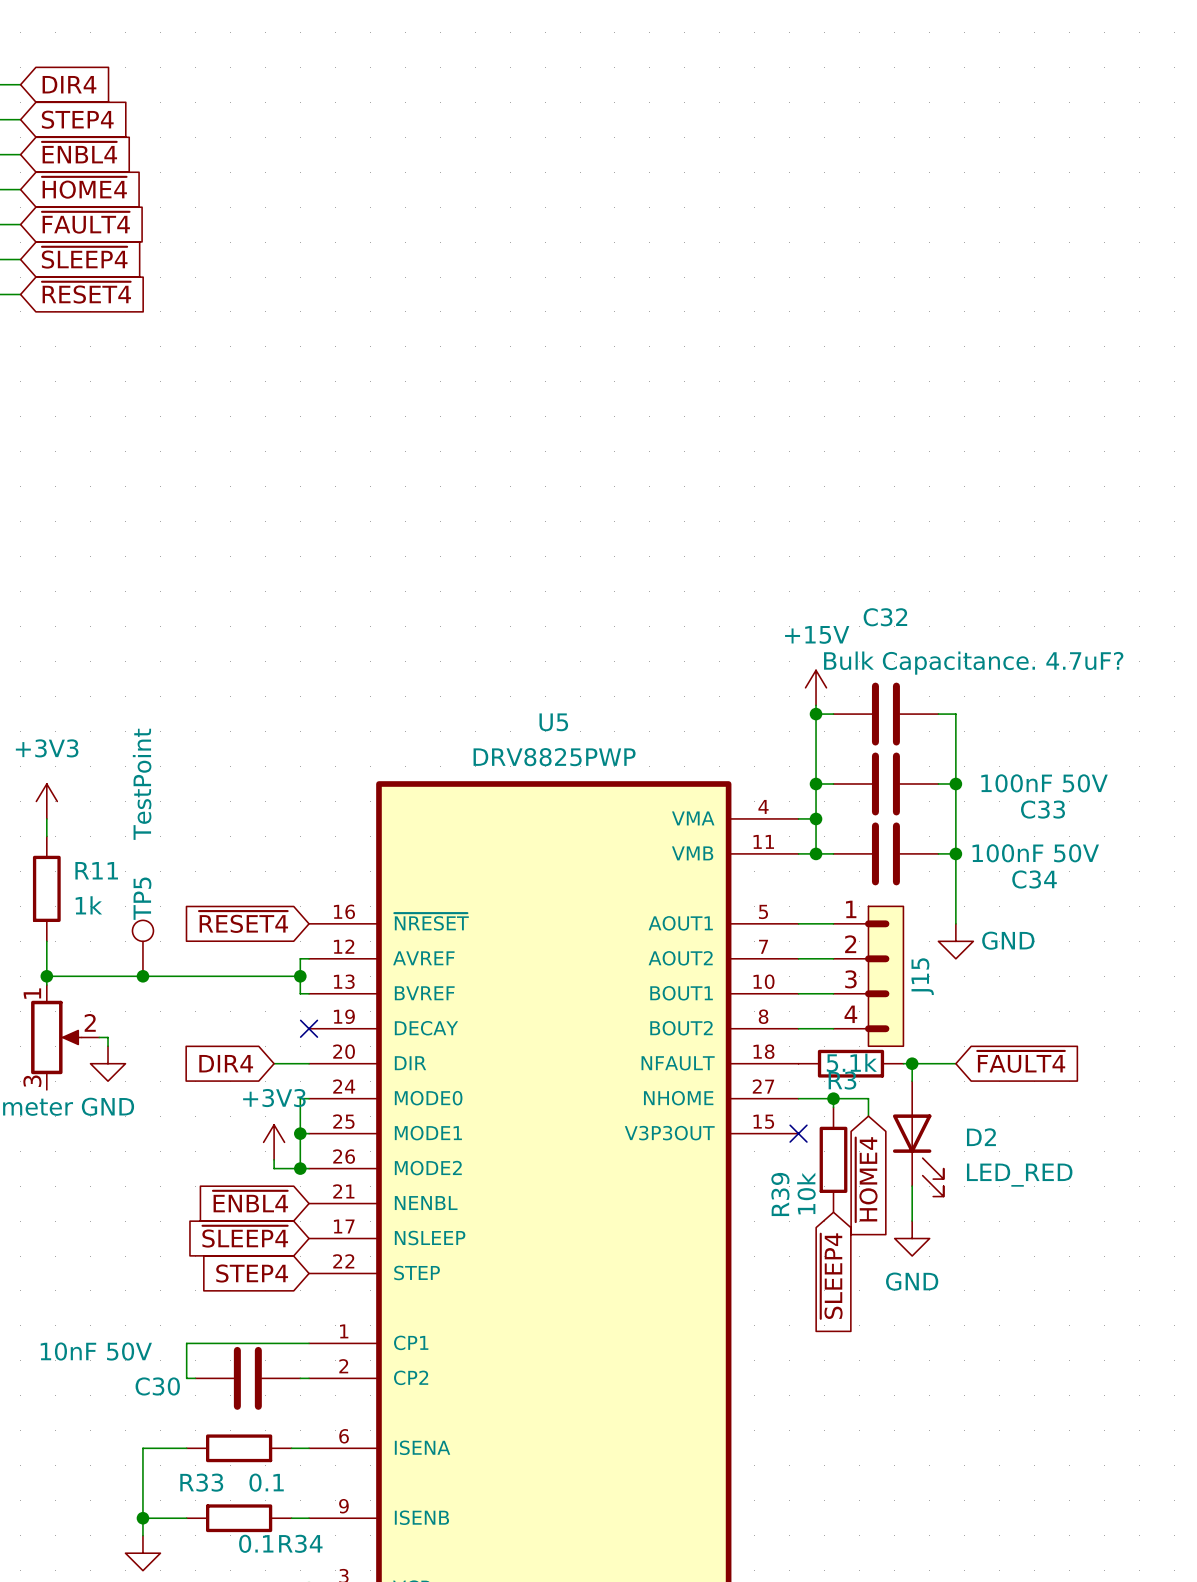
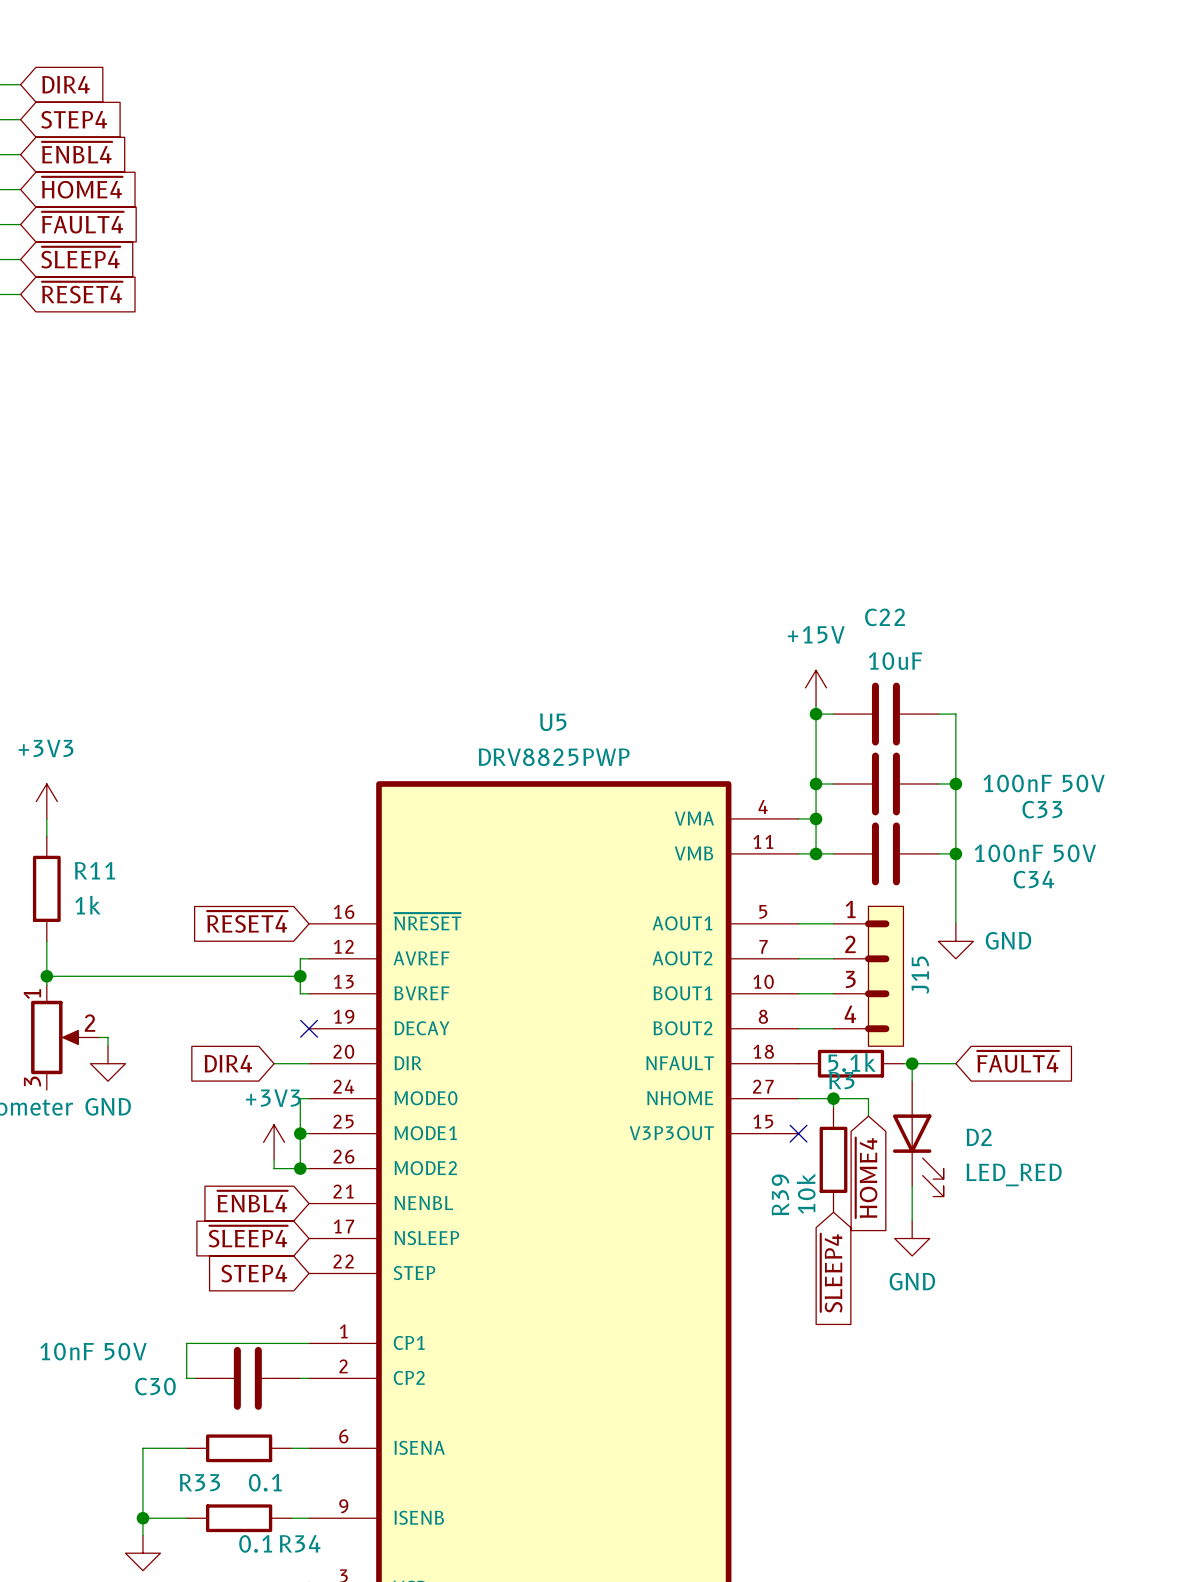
C32 name: C32 (885, 617) -> C22 (885, 617)
C32 value: Bulk Capacitance. 4.7uF? (973, 663) -> 10uF (895, 661)
TP5: TestPoint (142, 948) -> none
junction: (142, 976) -> none

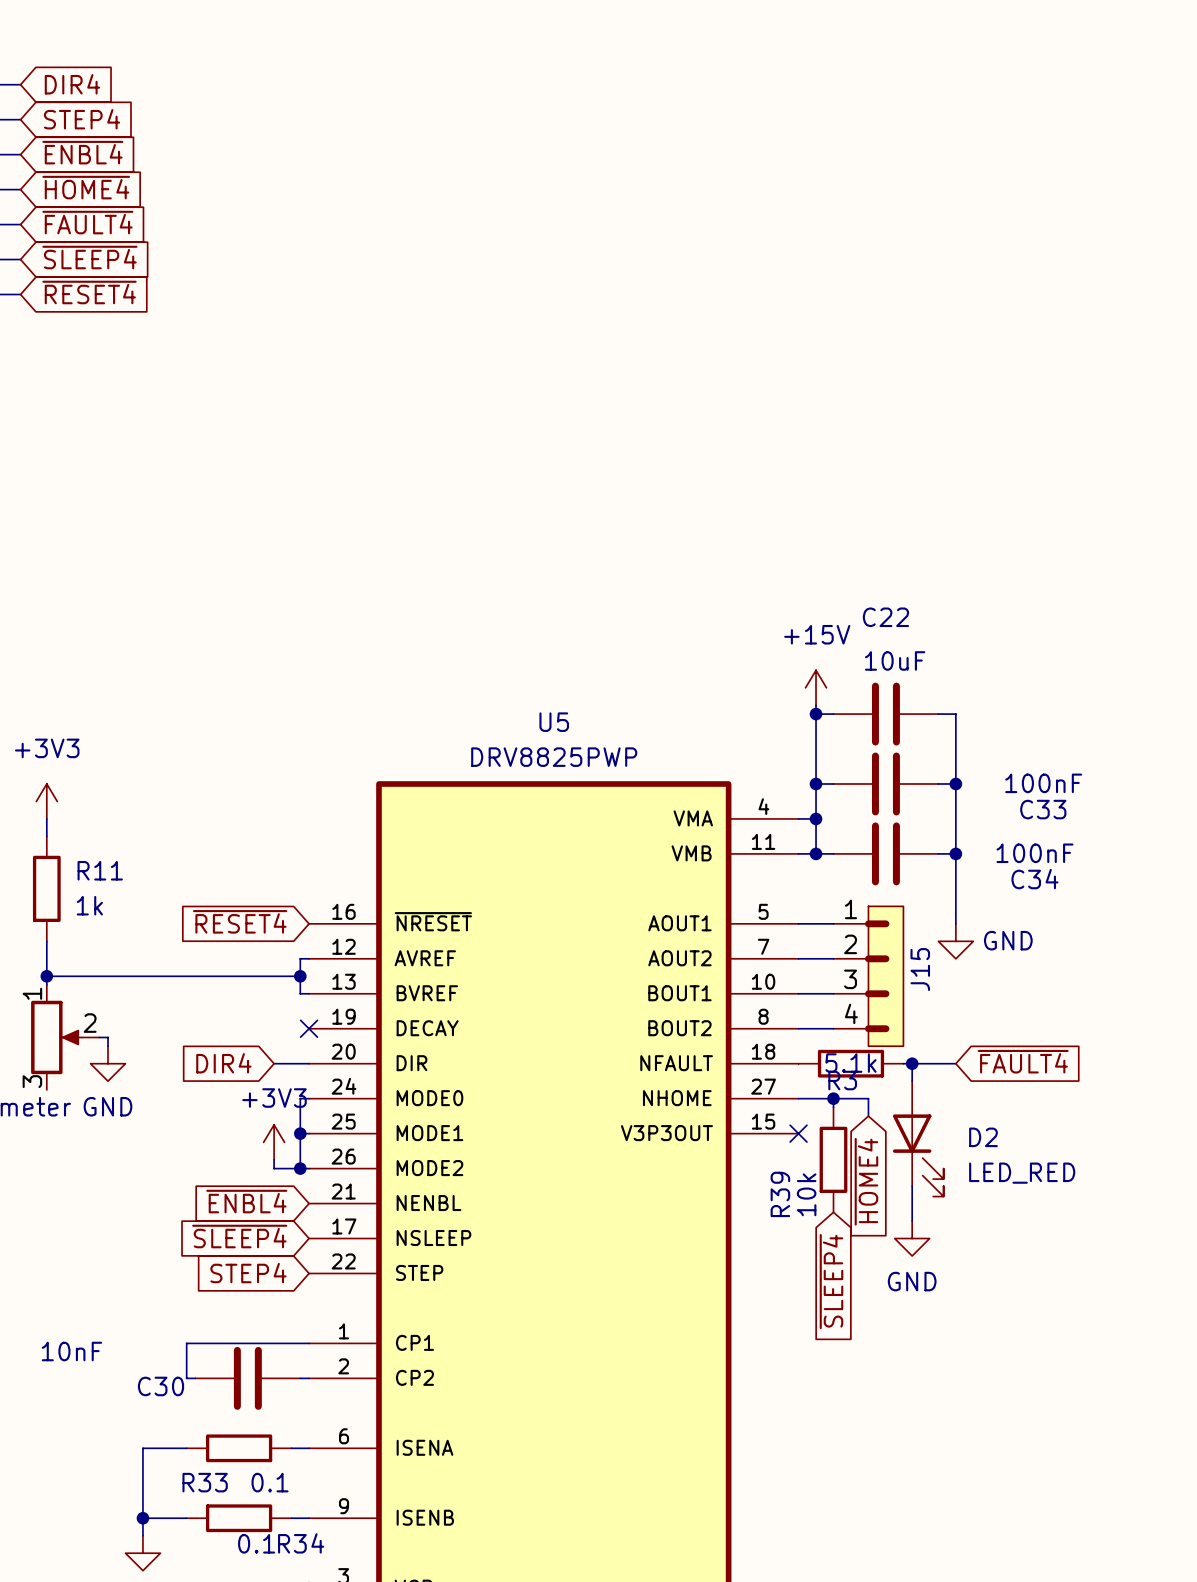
C33 value: 100nF 50V (1044, 783) -> 100nF (1043, 783)
C34 value: 100nF 50V (1035, 853) -> 100nF (1034, 853)
C30 value: 10nF 50V (93, 1351) -> 10nF (71, 1351)

